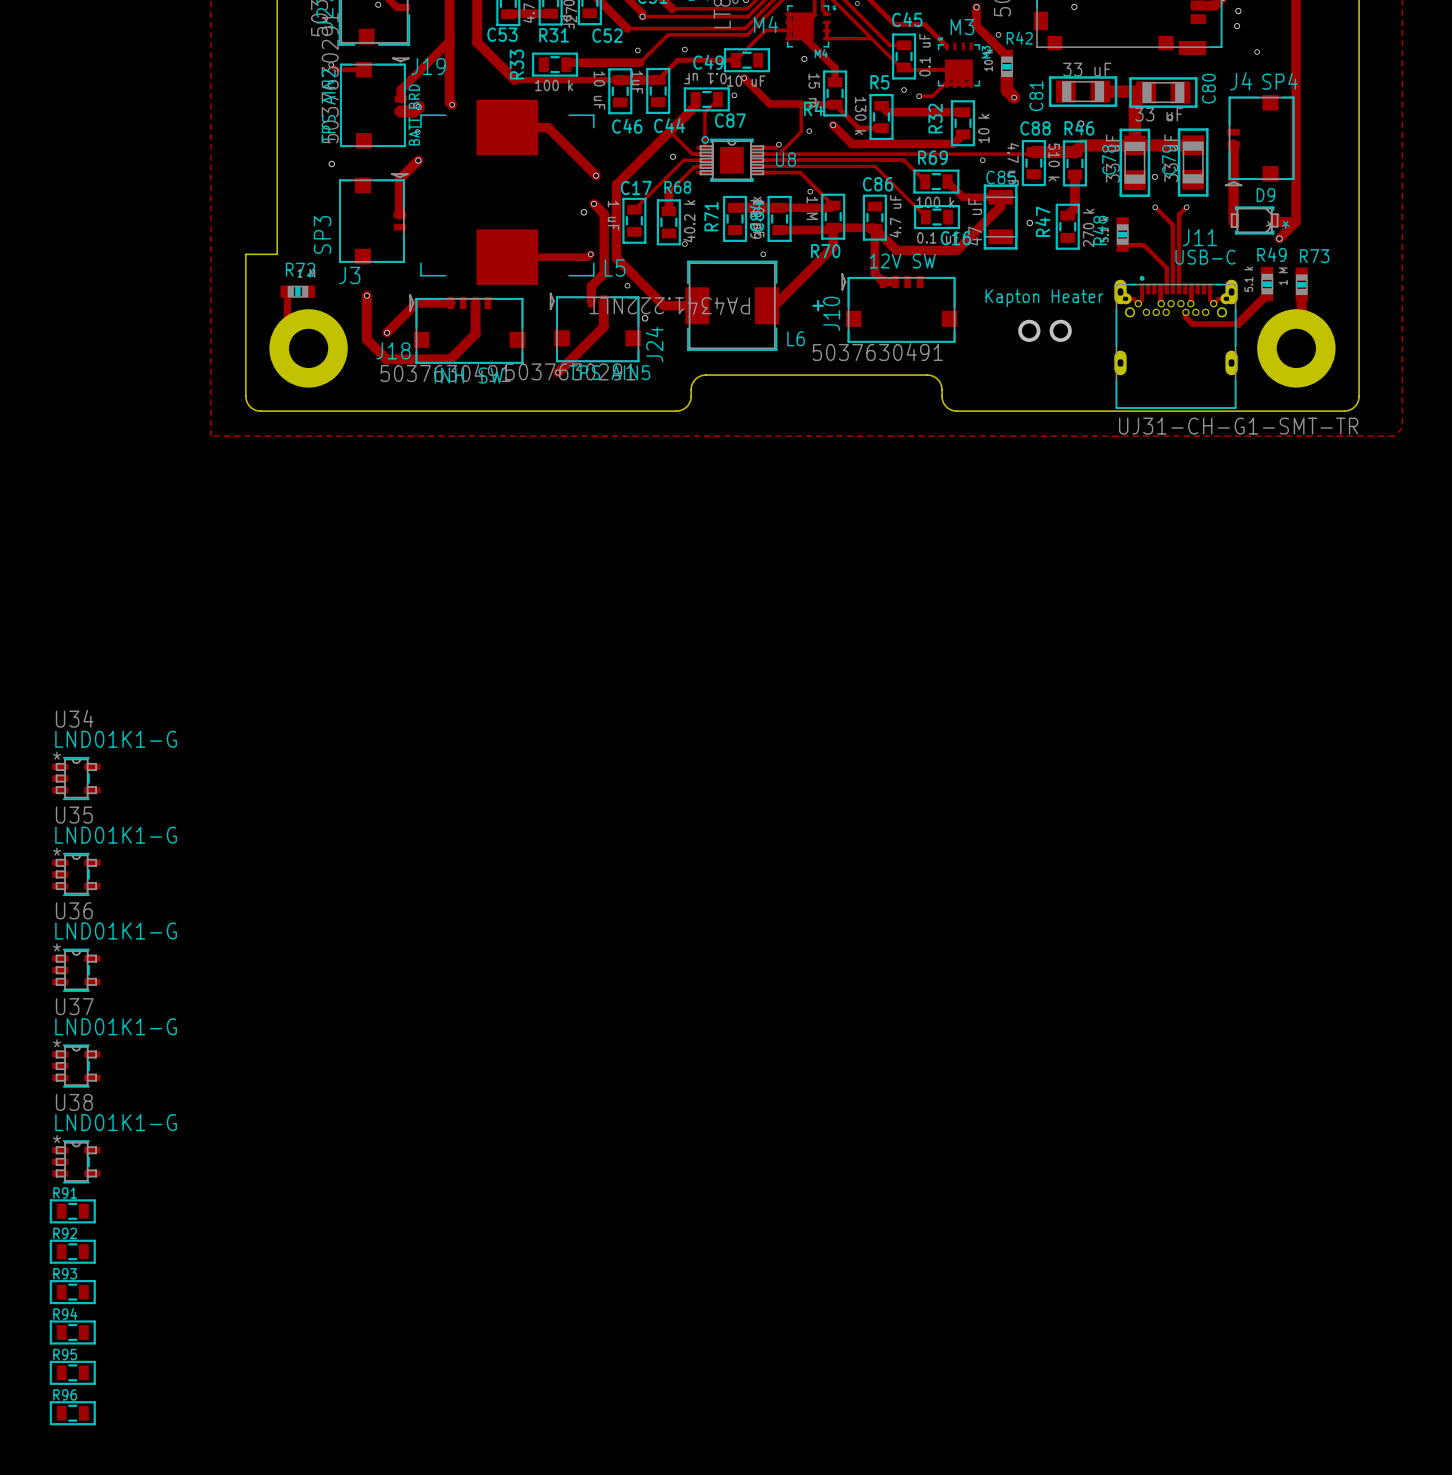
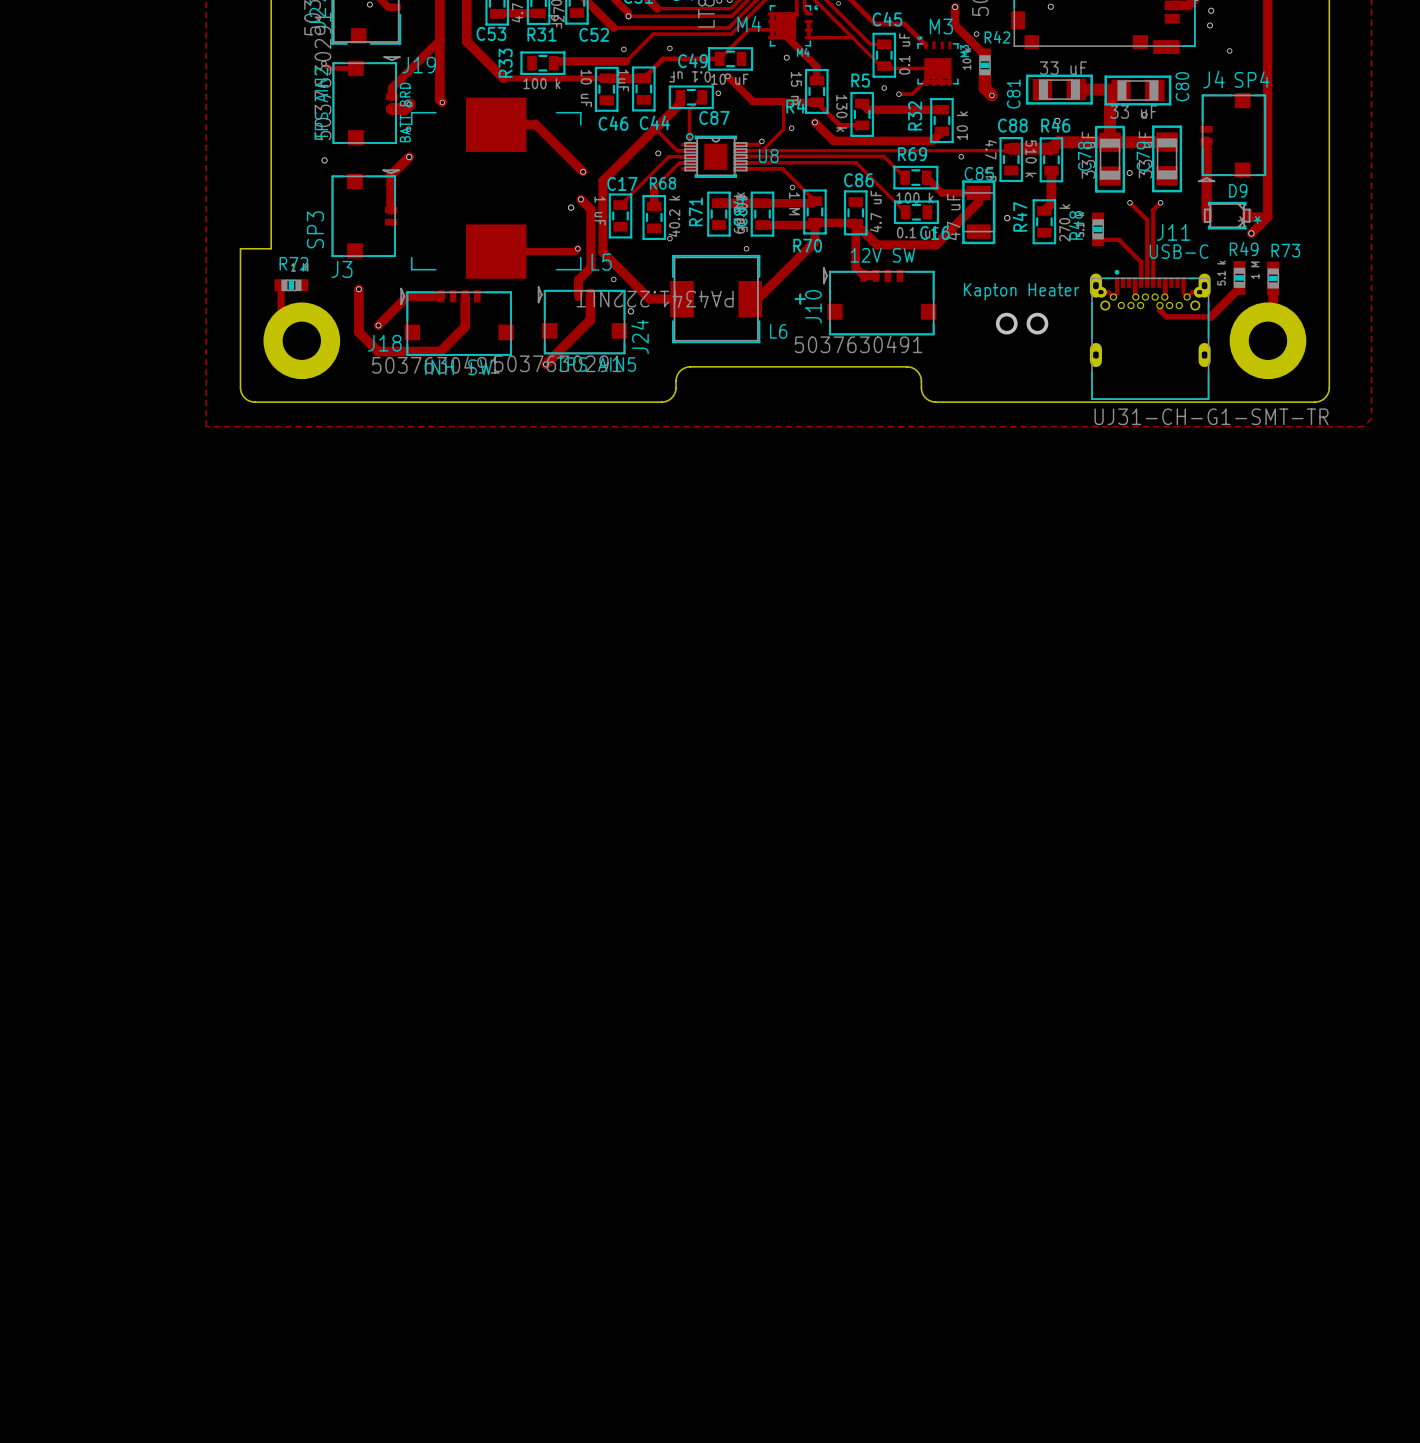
U34: LND01K1-G (76, 778) -> none
U35: LND01K1-G (76, 874) -> none
U36: LND01K1-G (76, 970) -> none
U37: LND01K1-G (76, 1066) -> none
U38: LND01K1-G (76, 1161) -> none
R91: (72, 1211) -> none
R92: (72, 1251) -> none
R93: (72, 1292) -> none
R94: (72, 1332) -> none
R95: (72, 1372) -> none
R96: (72, 1413) -> none

